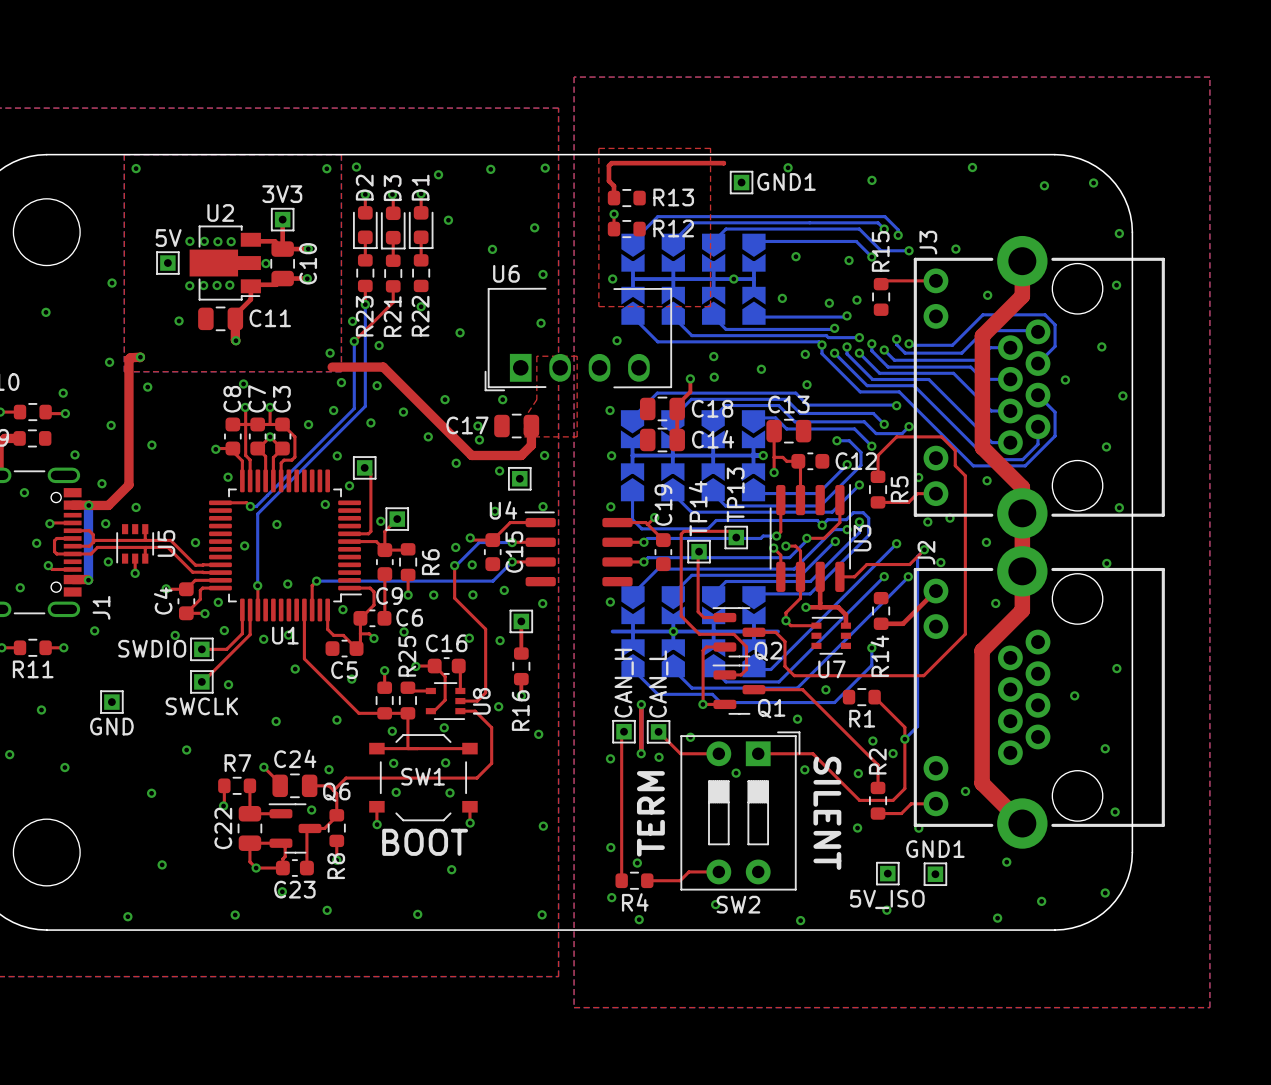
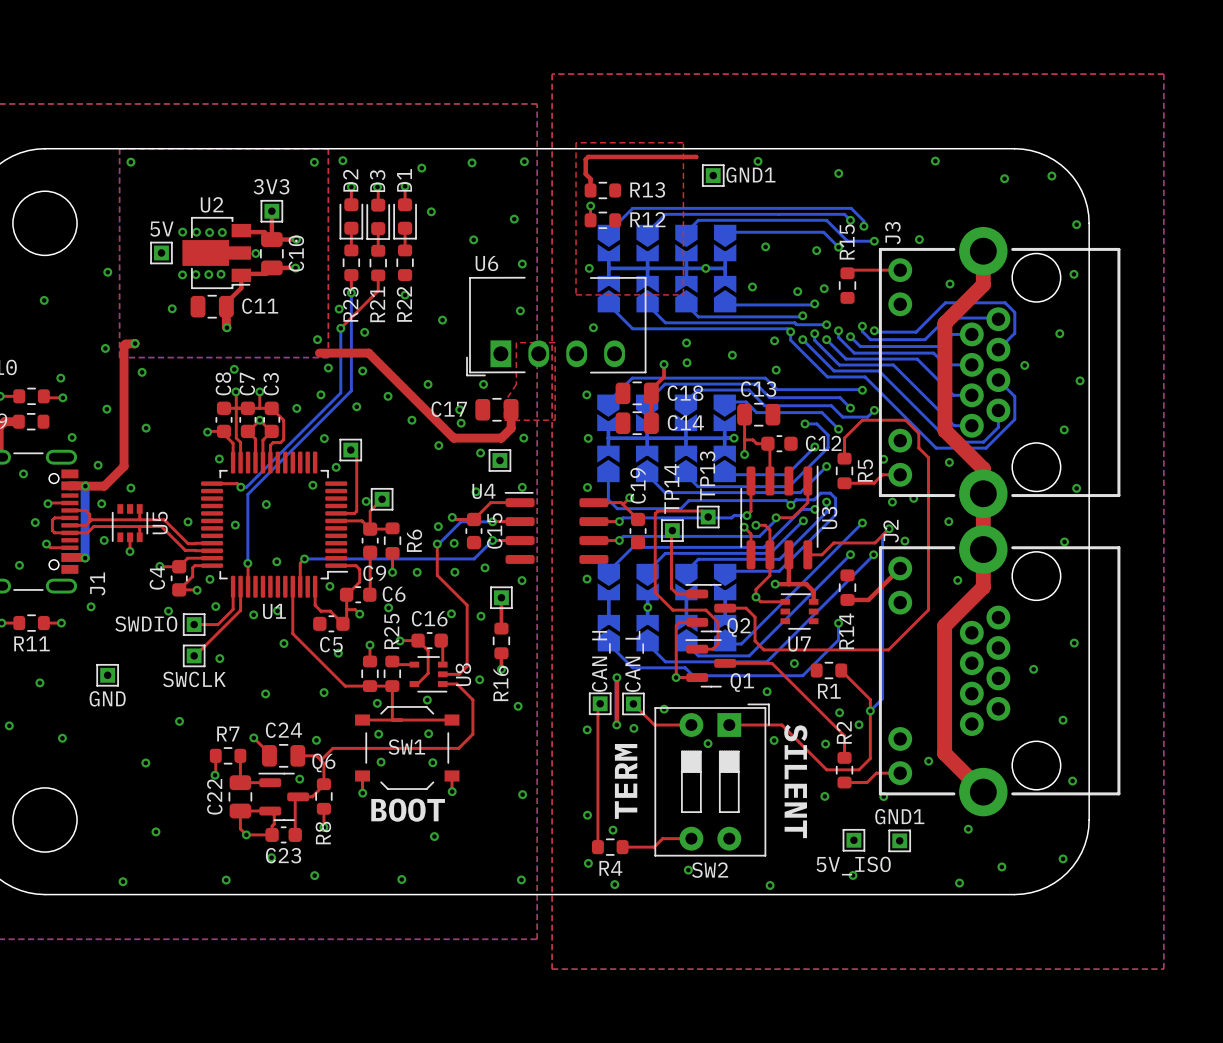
bottom track: (612, 631) (778, 631) -> none

